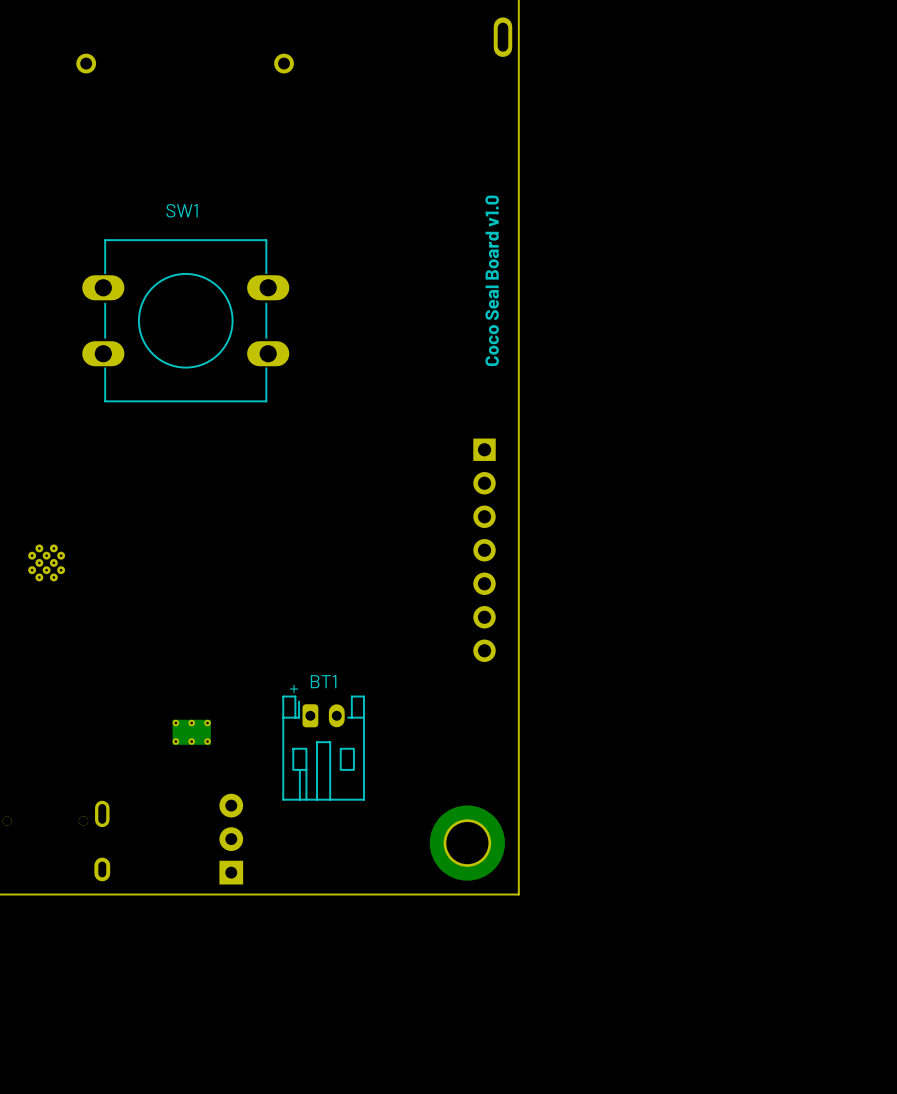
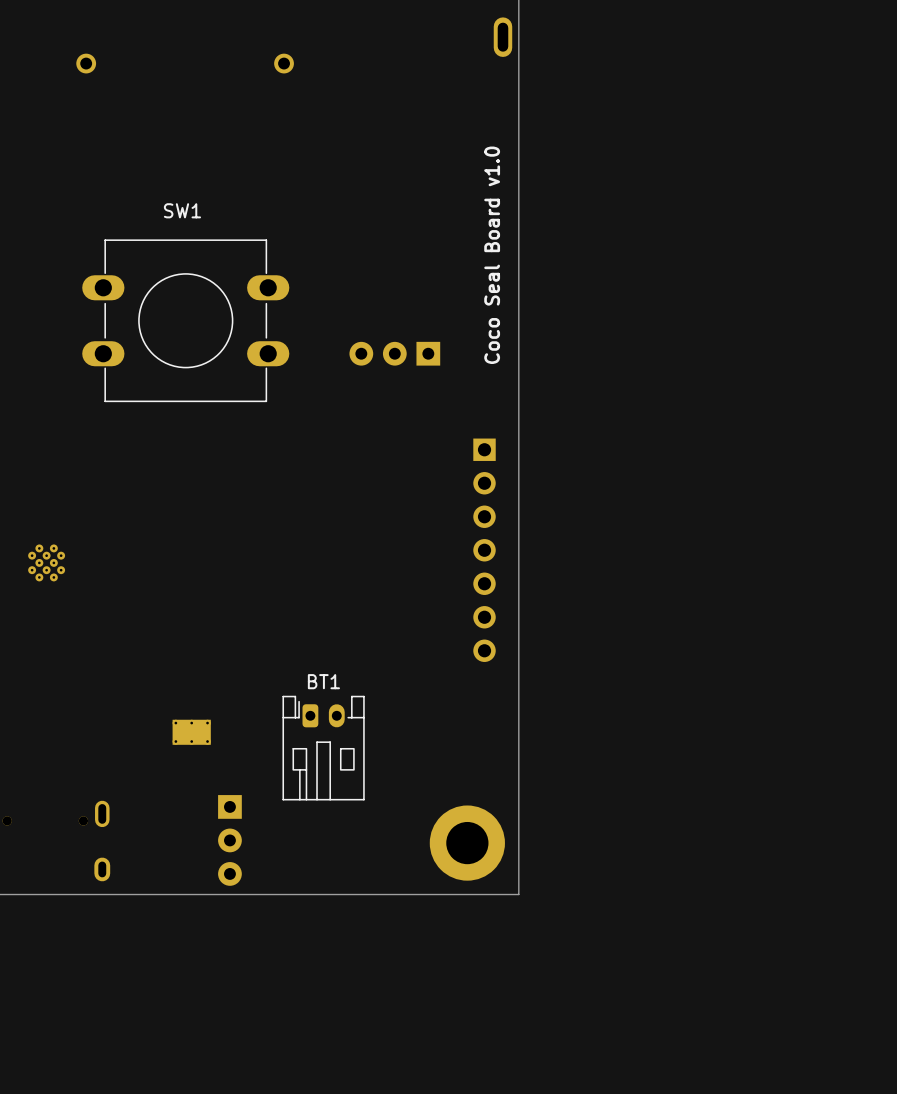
part: none -> (394, 353)
text: + (294, 688) -> none
part rotation: 0° (231, 839) -> 180° (229, 840)

